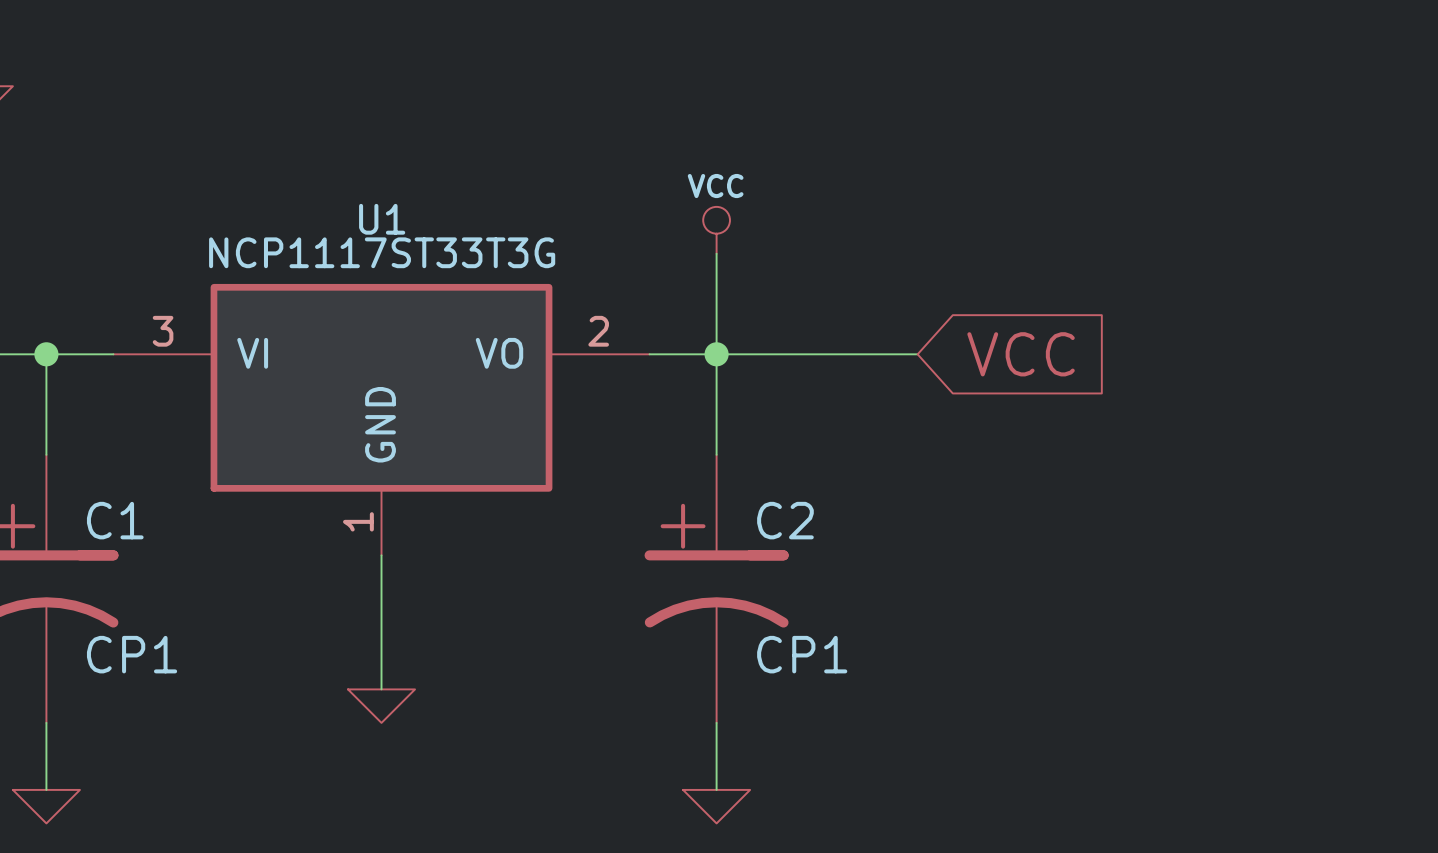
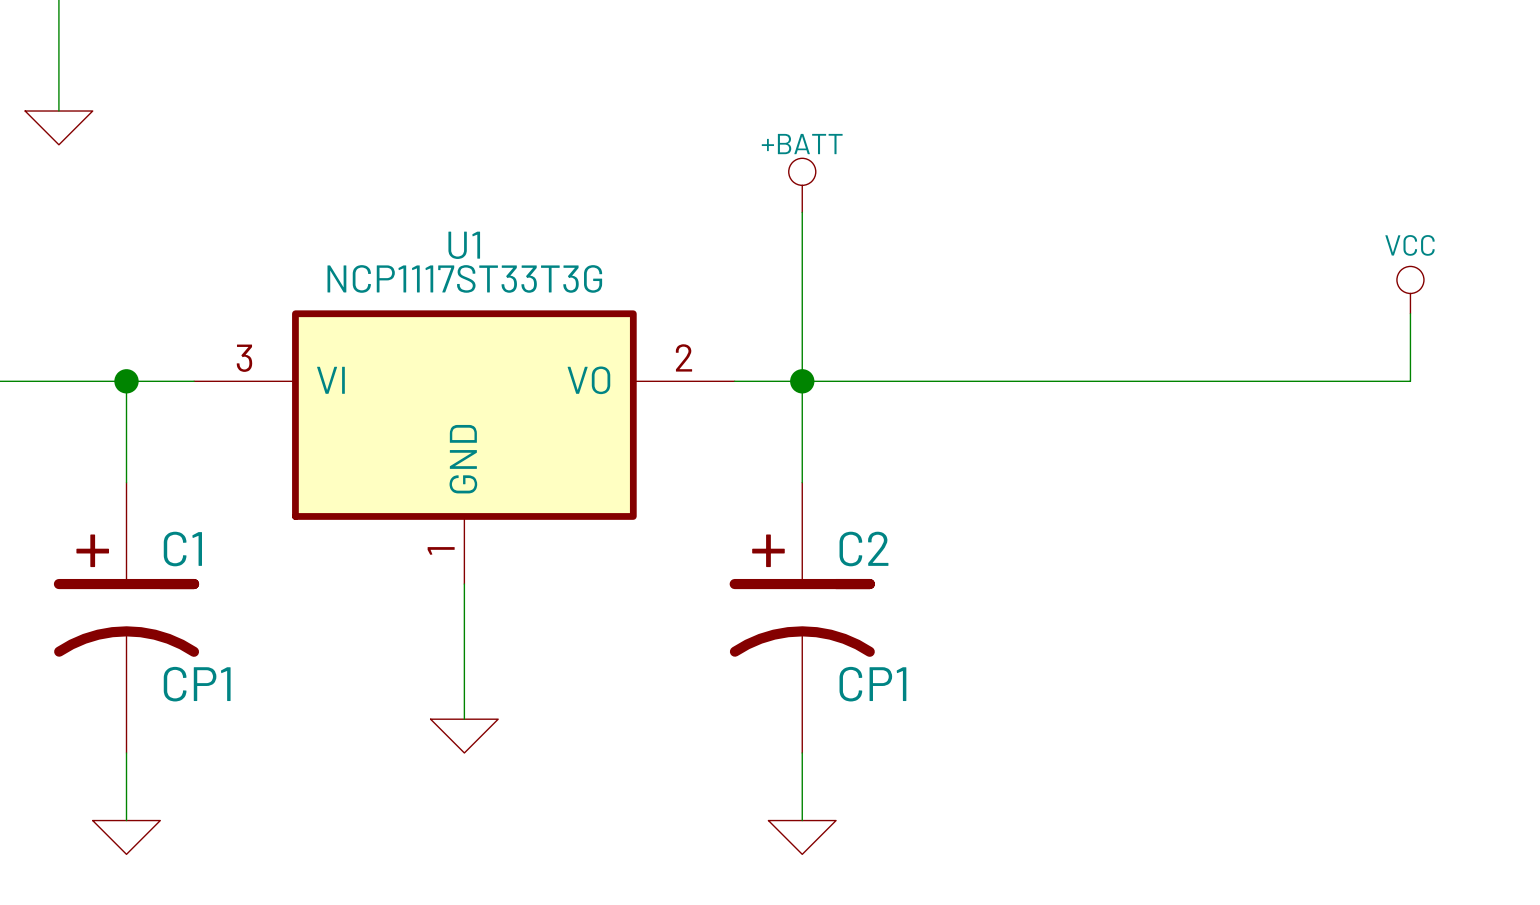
power symbol: none -> +BATT (802, 185)
wire: none -> (802, 212) (802, 279)
power symbol position: VCC (716, 230) -> VCC (1410, 290)
wire: none -> (1410, 313) (1410, 381) (1004, 381)
global label: VCC (1021, 354) -> none

